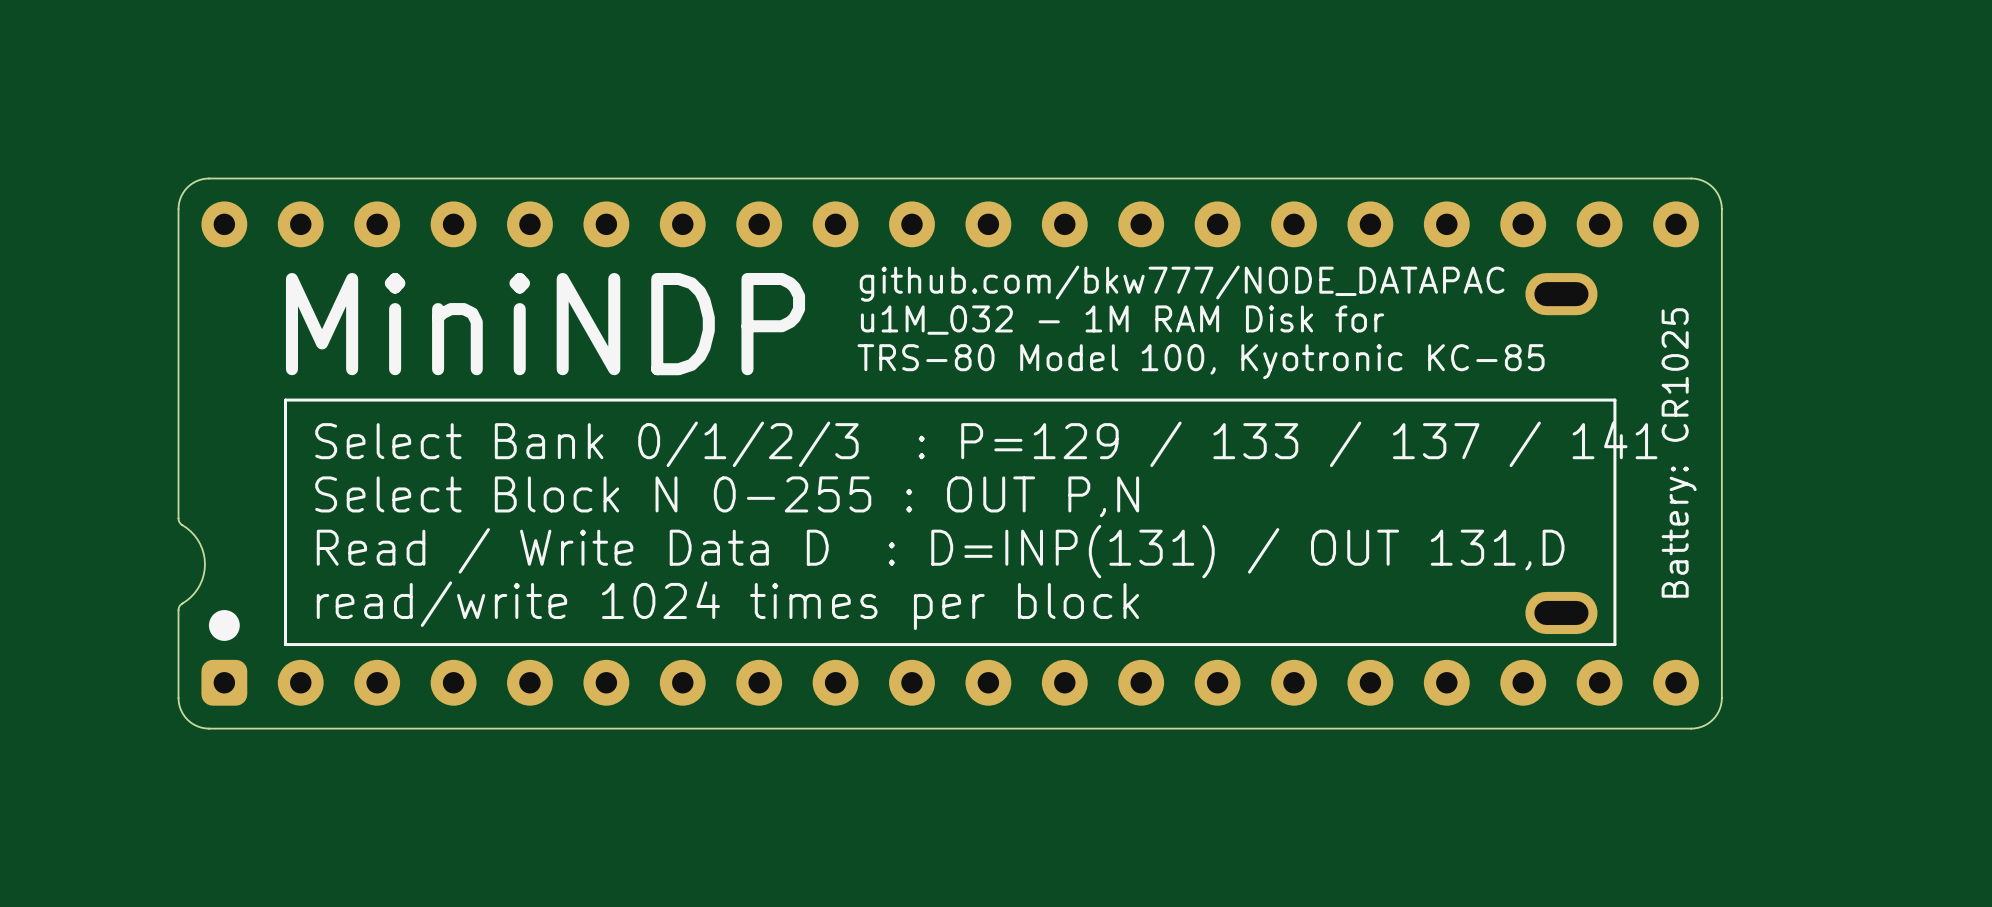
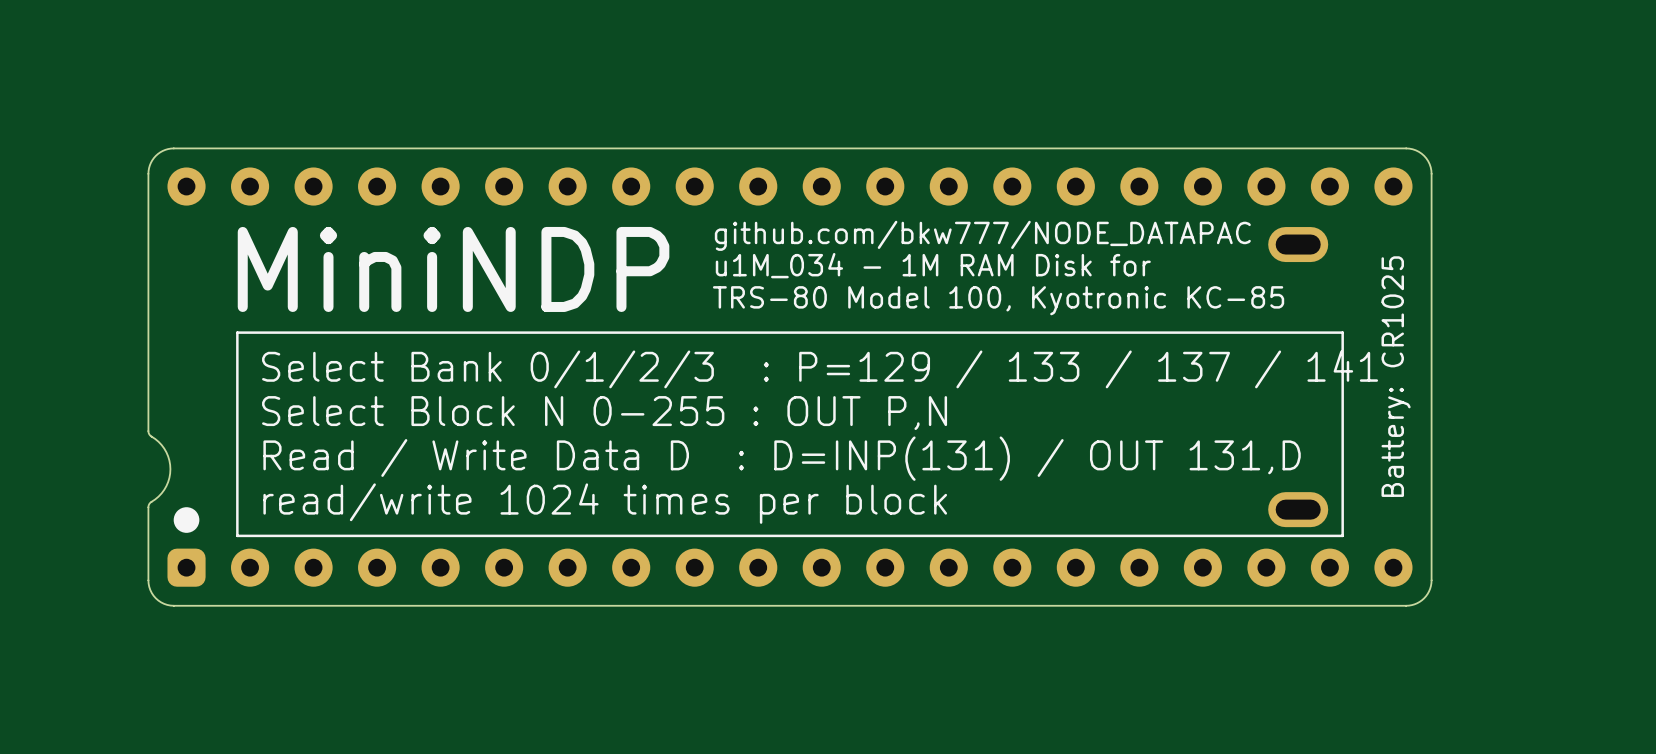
text: u1M_032 - 1M RAM Disk for (1122, 320) -> u1M_034 - 1M RAM Disk for (933, 265)

